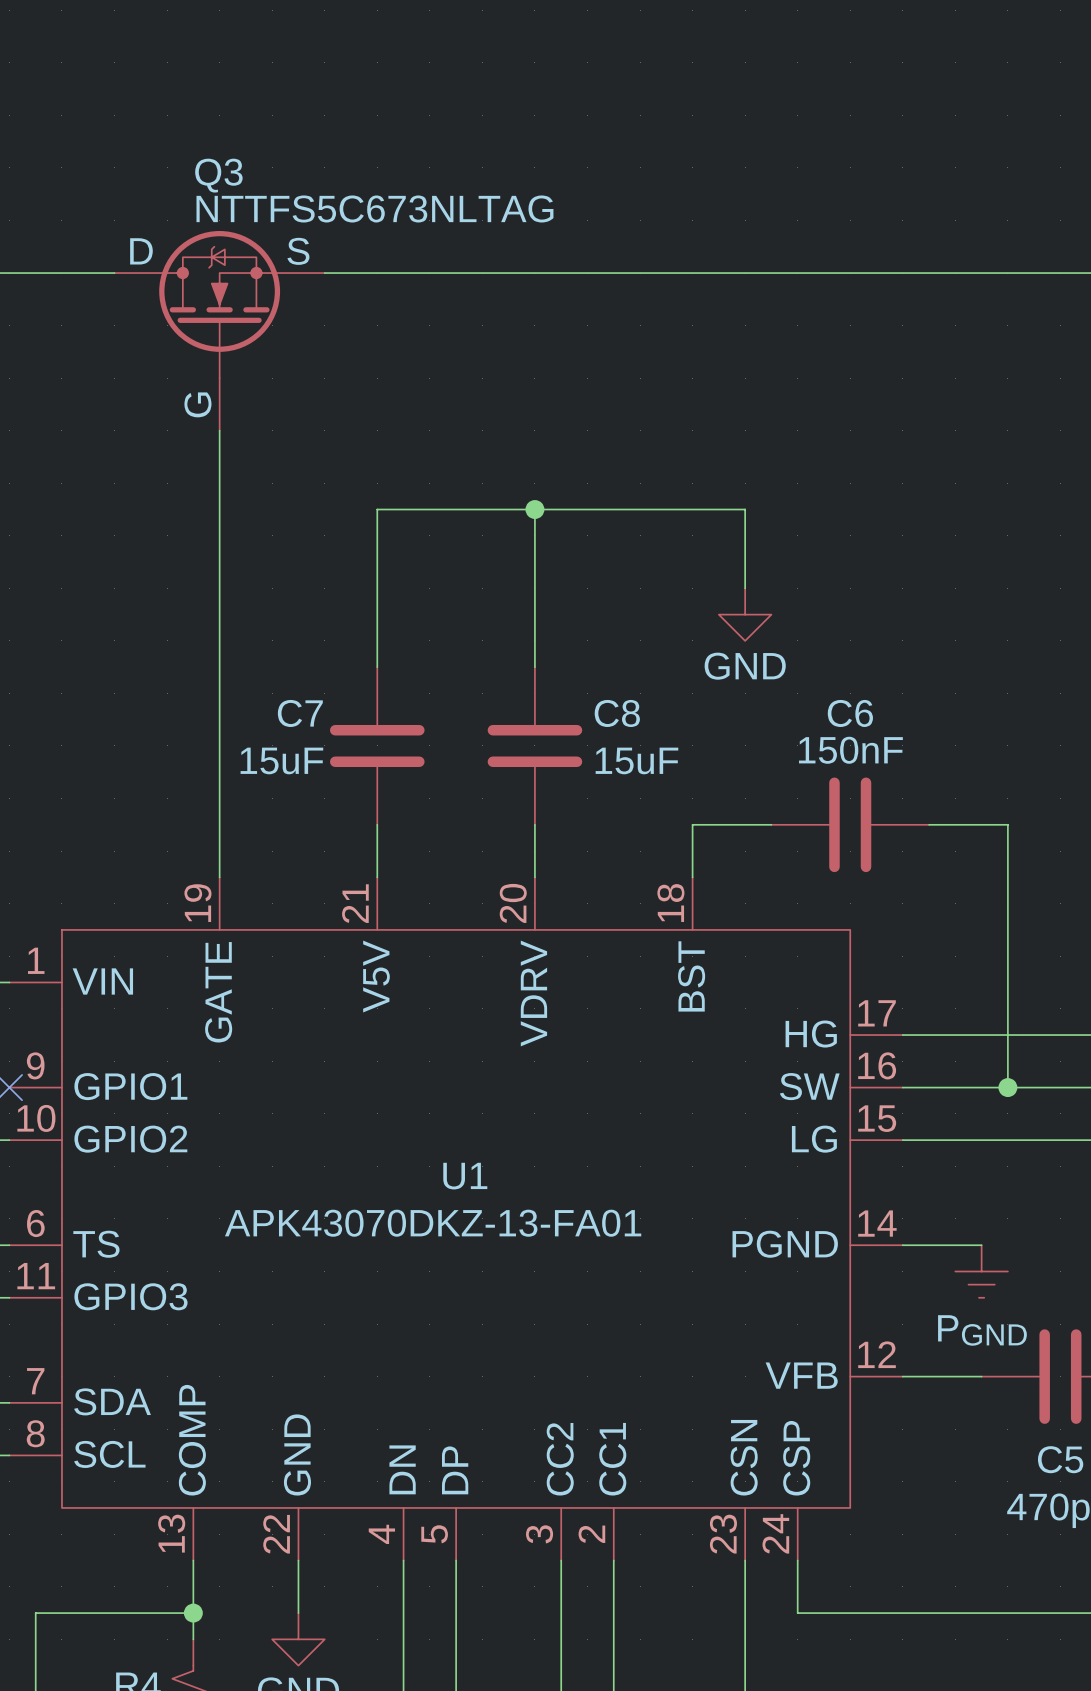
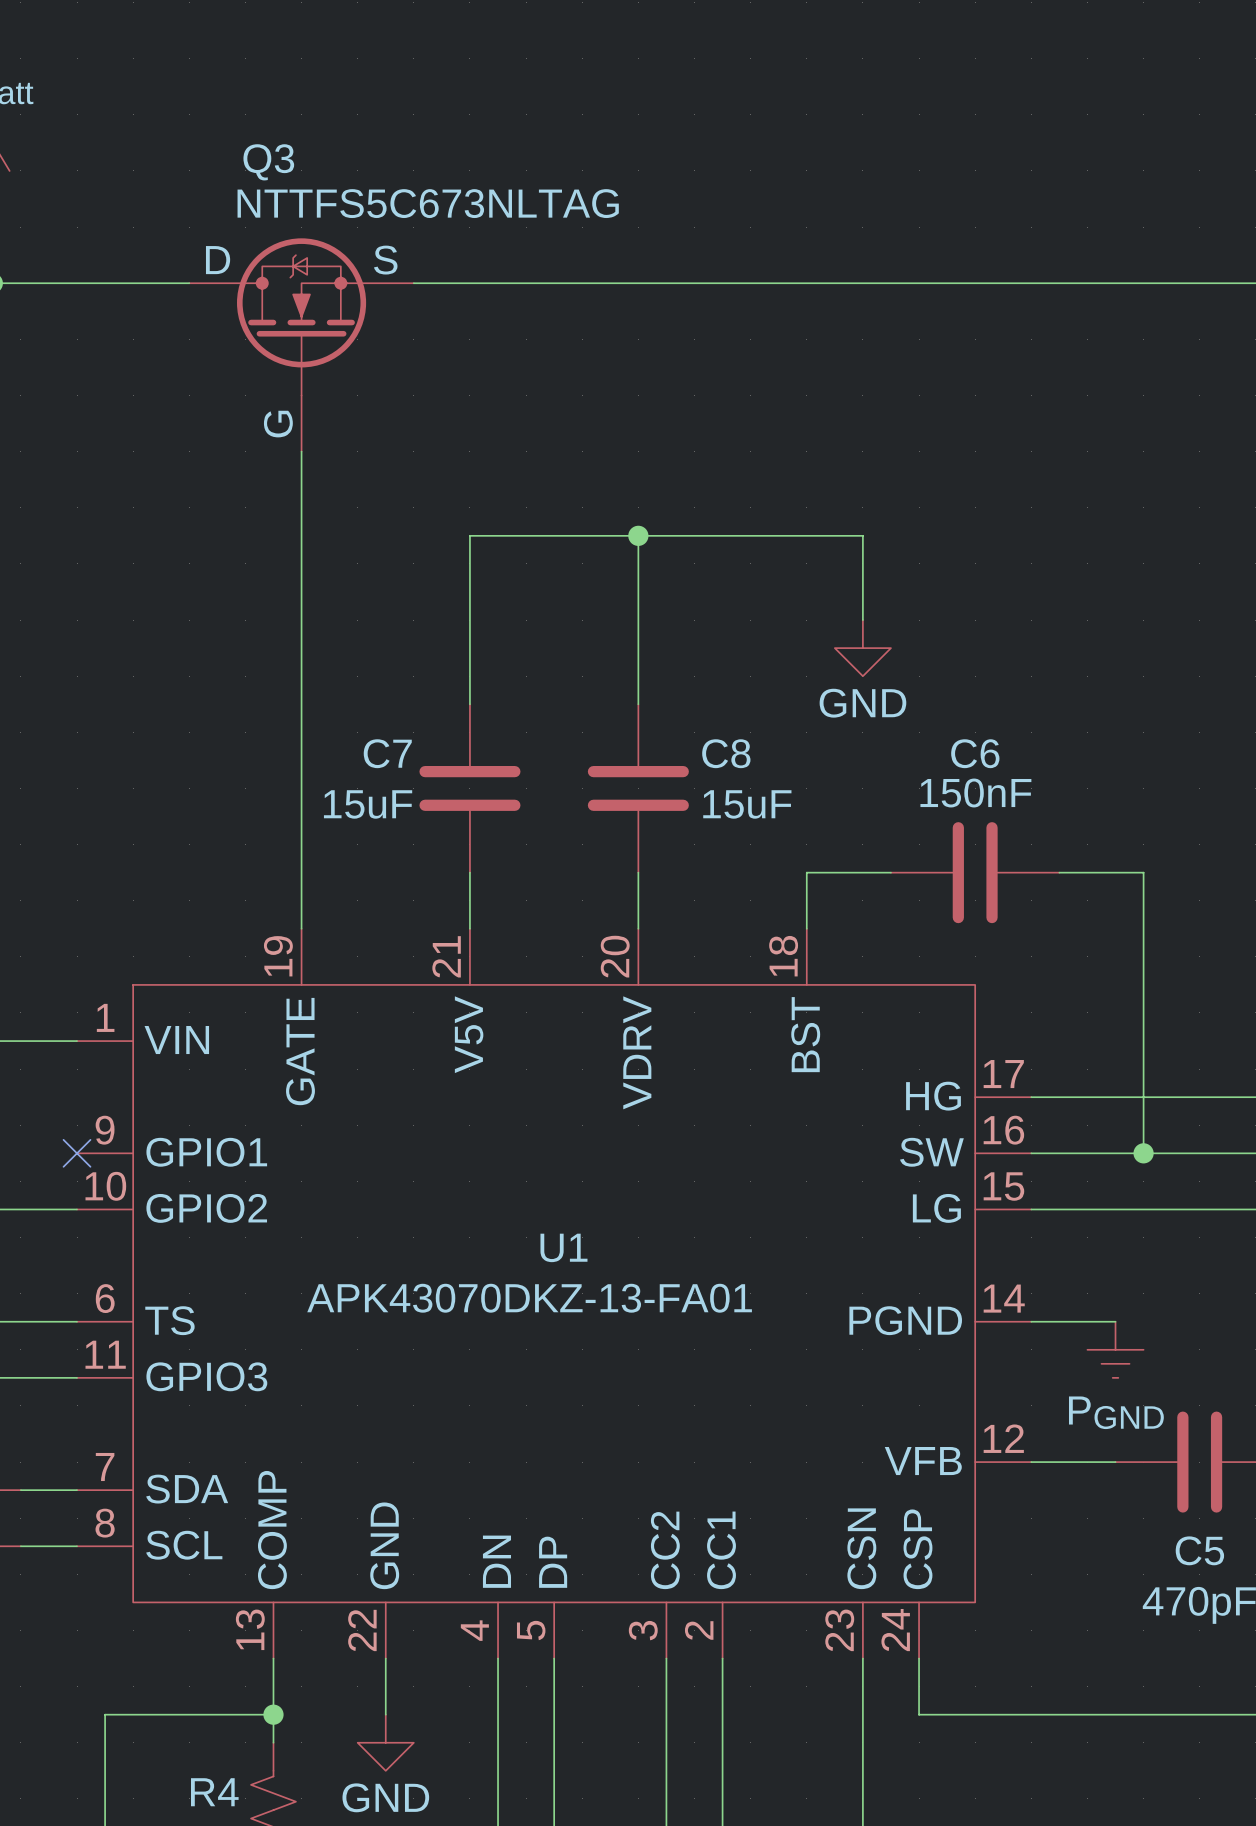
Q3 name position: Q3 (218, 175) -> Q3 (268, 162)
Q3 value position: NTTFS5C673NLTAG (374, 208) -> NTTFS5C673NLTAG (428, 203)

